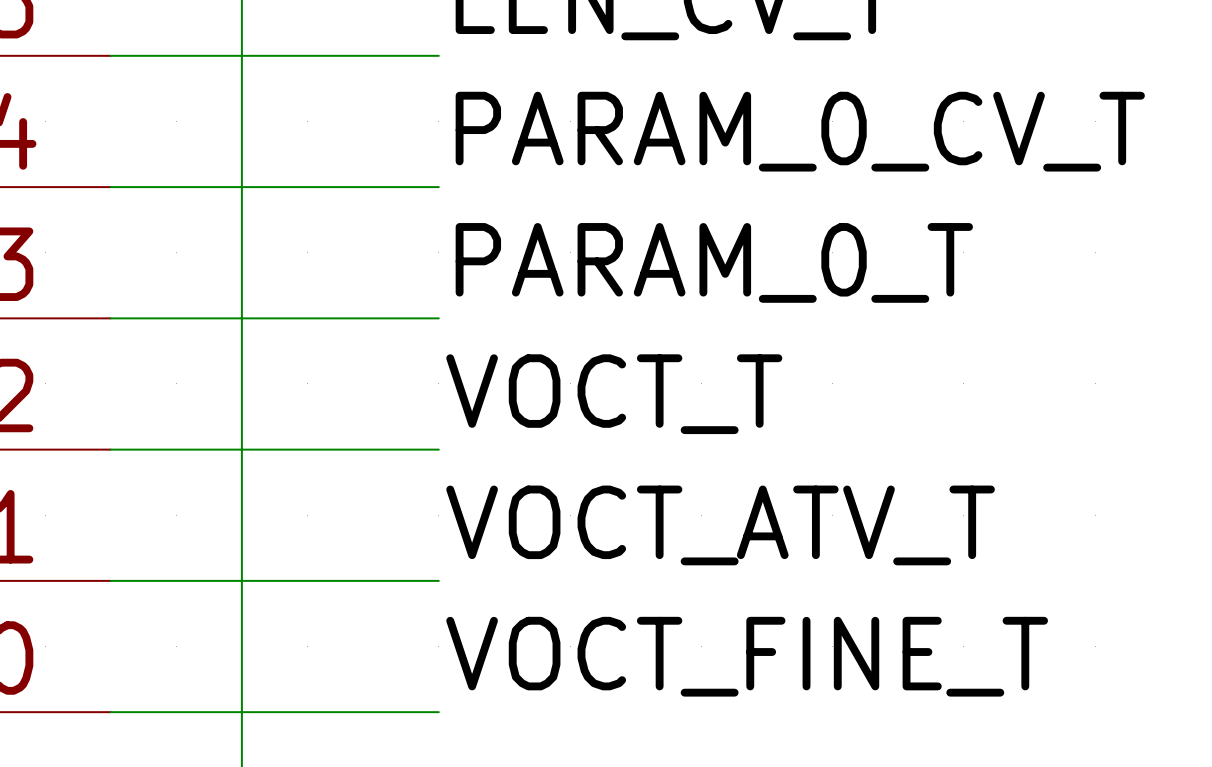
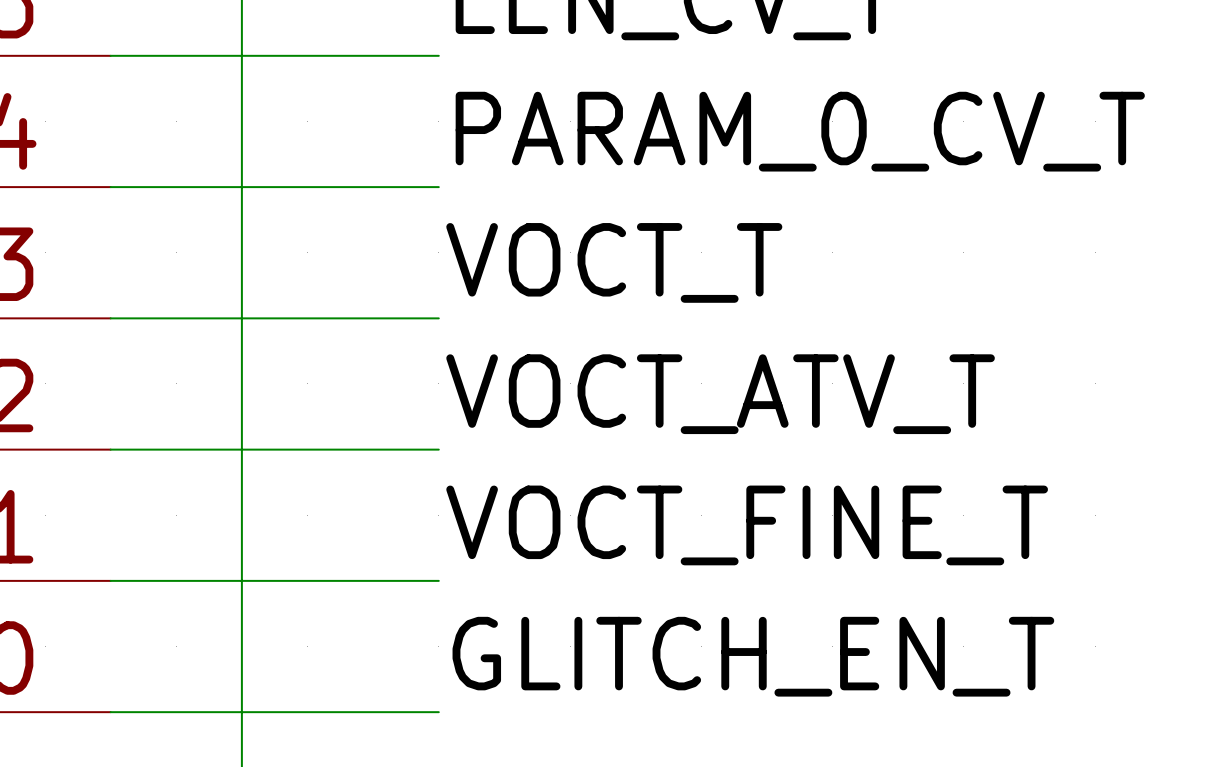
label: PARAM_0_T (714, 262) -> VOCT_T (614, 262)
label: VOCT_T (614, 394) -> VOCT_ATV_T (720, 394)
label: VOCT_ATV_T (720, 525) -> VOCT_FINE_T (747, 525)
label: VOCT_FINE_T (747, 656) -> GLITCH_EN_T (753, 656)

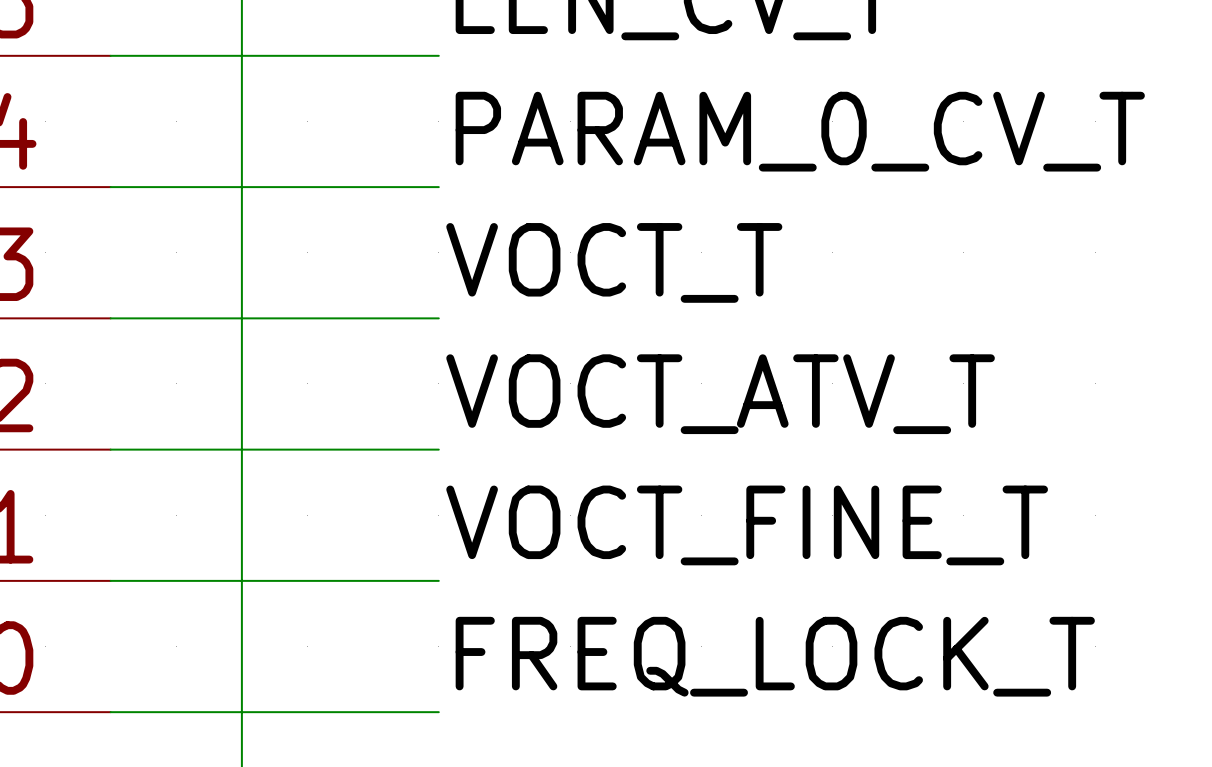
label: GLITCH_EN_T (753, 656) -> FREQ_LOCK_T (775, 656)

